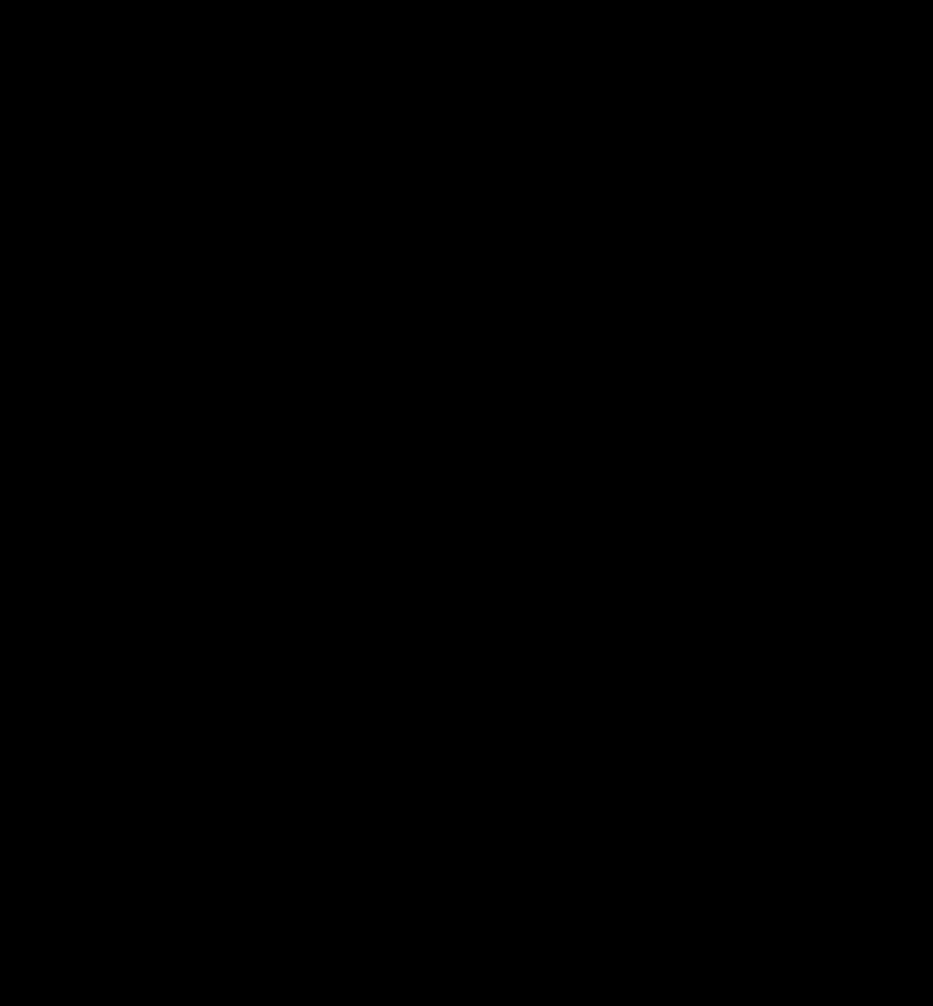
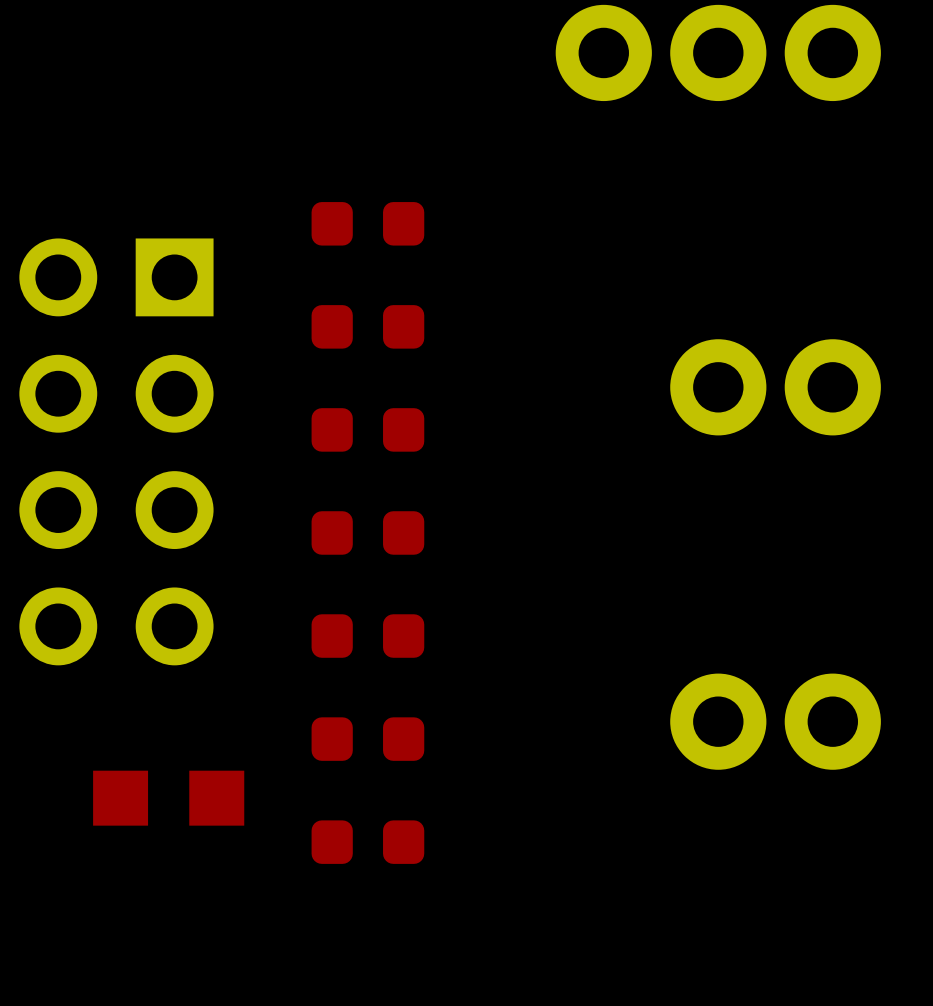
part: none -> (718, 52)
part: none -> (367, 223)
part: none -> (367, 326)
part: none -> (775, 387)
part: none -> (367, 429)
part: none -> (116, 451)
part: none -> (367, 532)
part: none -> (367, 636)
part: none -> (775, 721)
part: none -> (367, 739)
part: none -> (168, 798)
part: none -> (367, 842)

